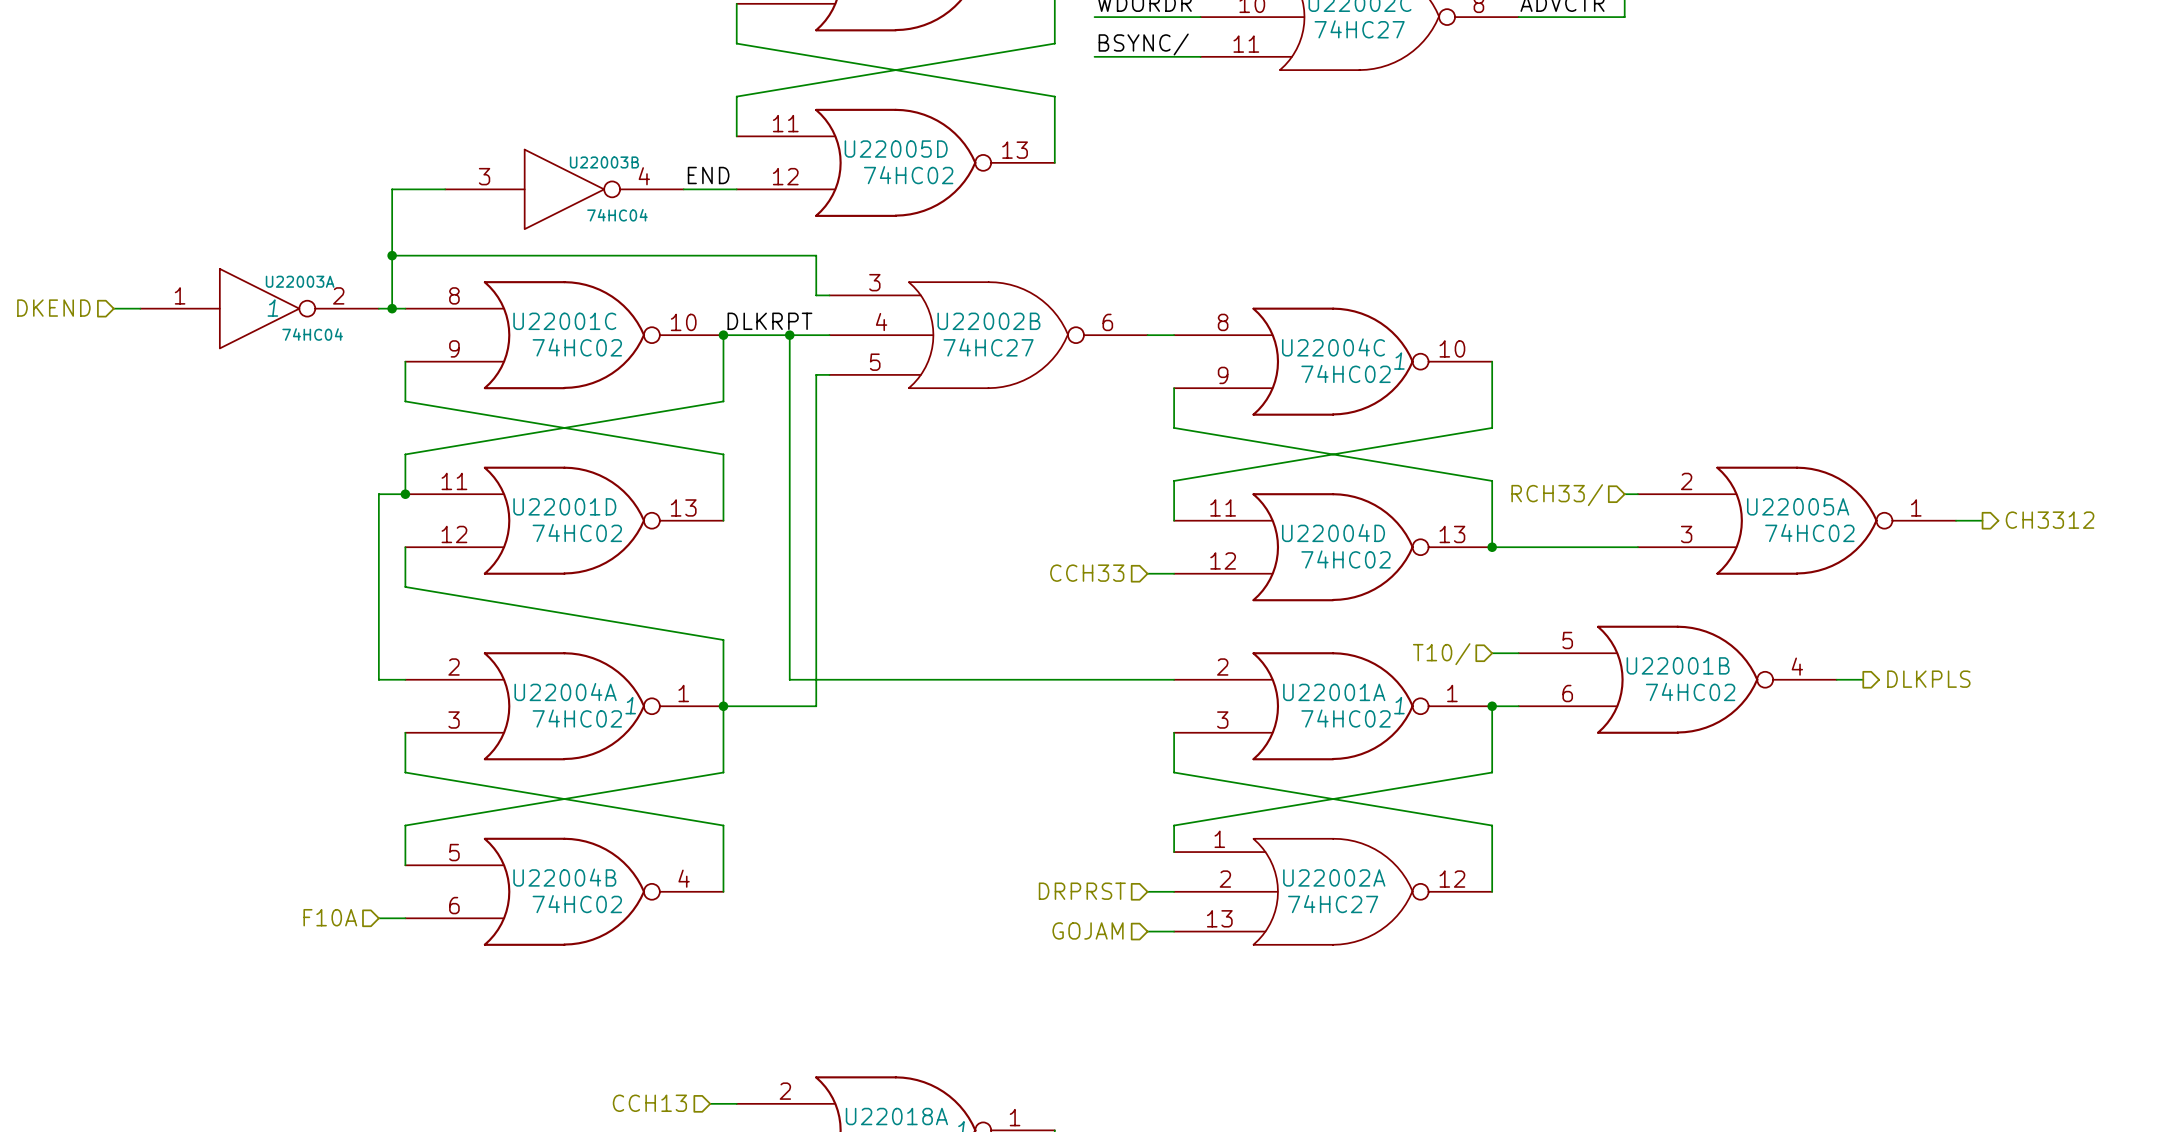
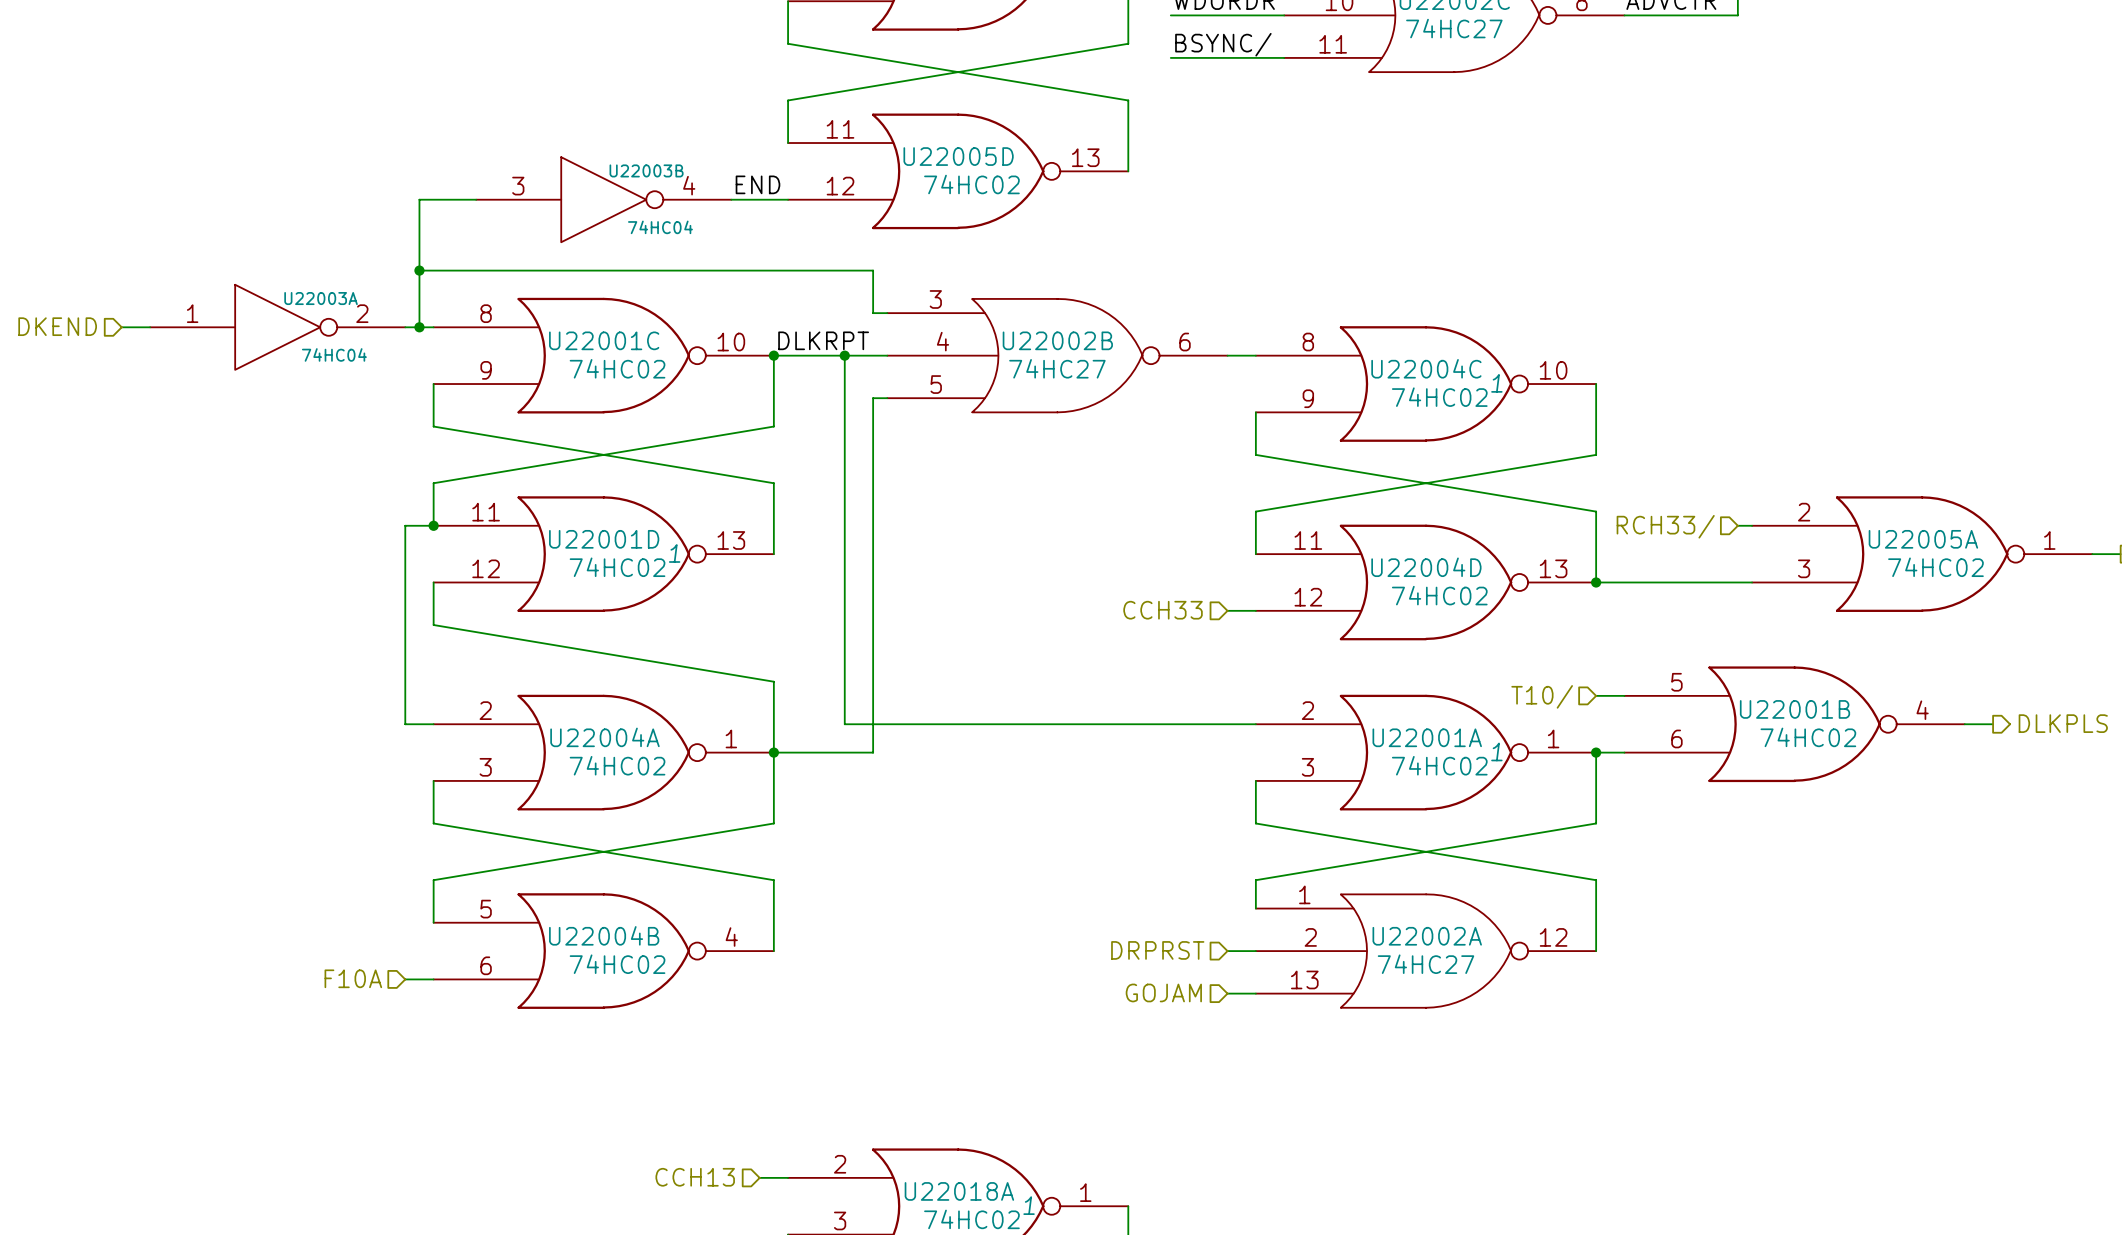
U22003A text: 1 (272, 308) -> none
U22001D text: none -> 1 (674, 553)
U22004A text: 1 (630, 705) -> none

